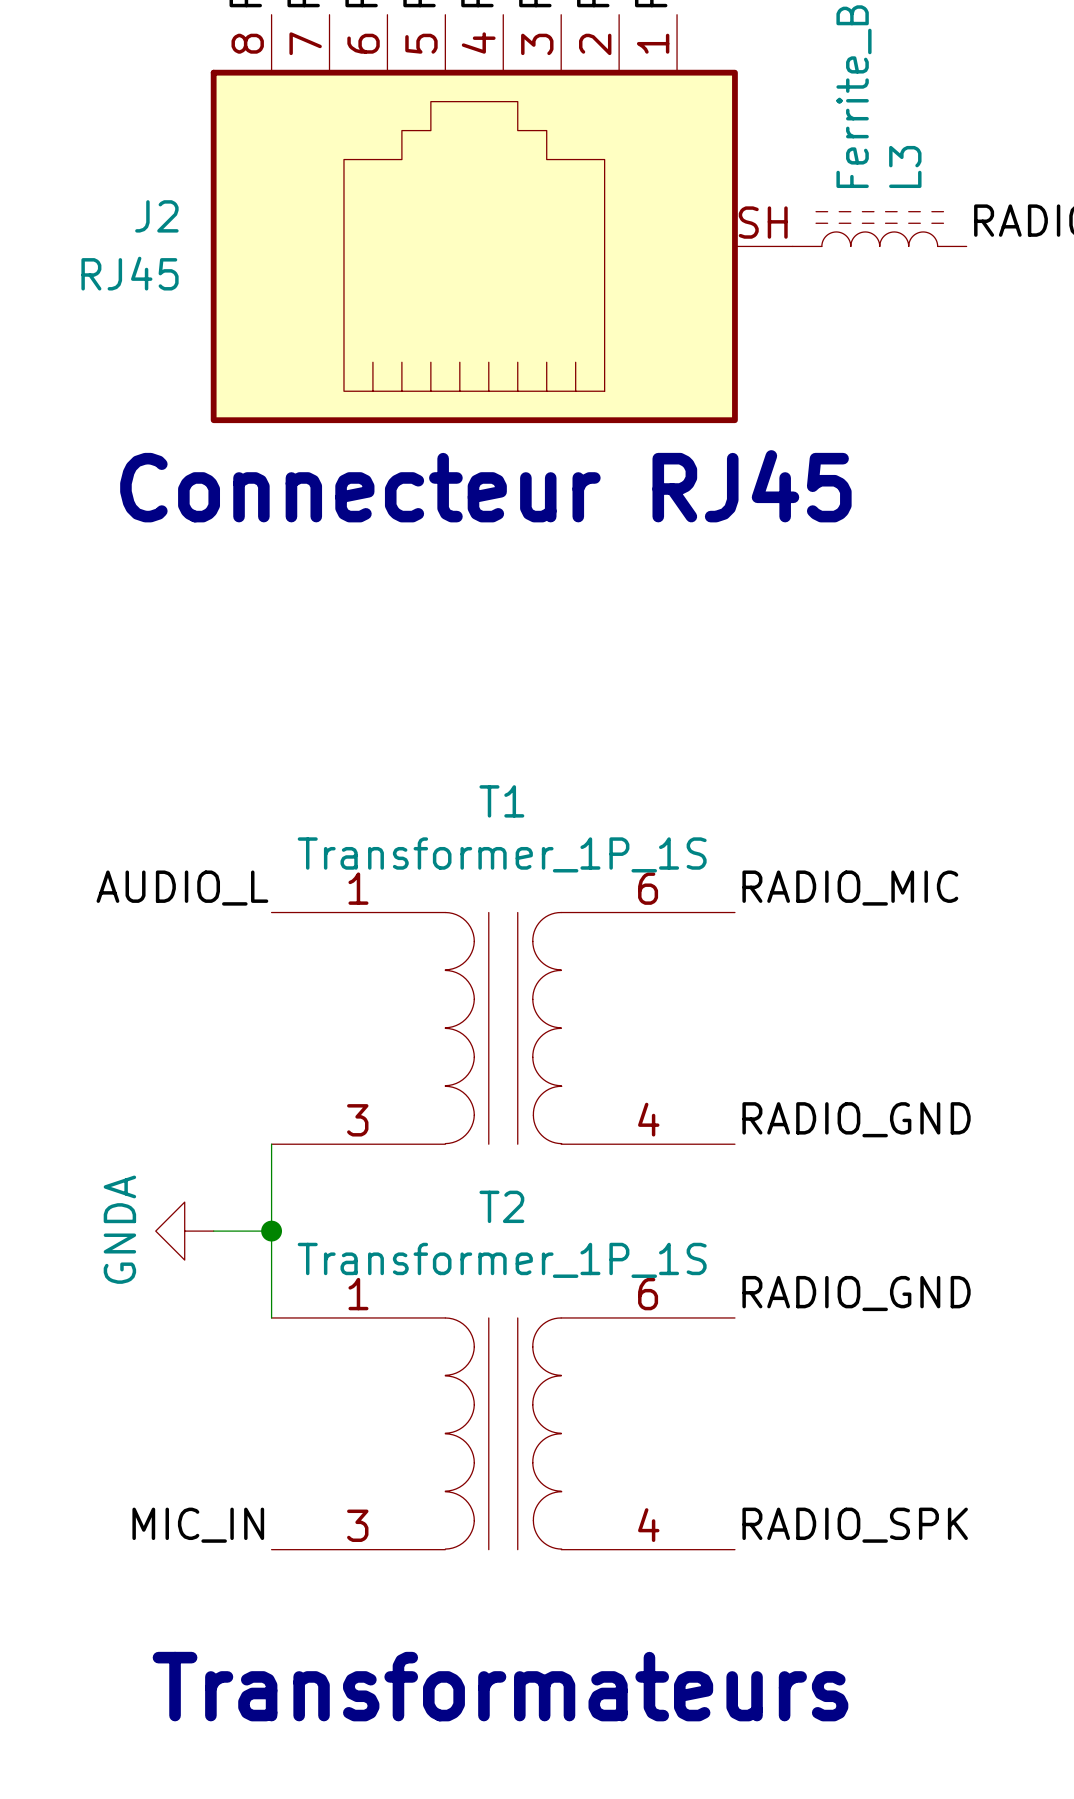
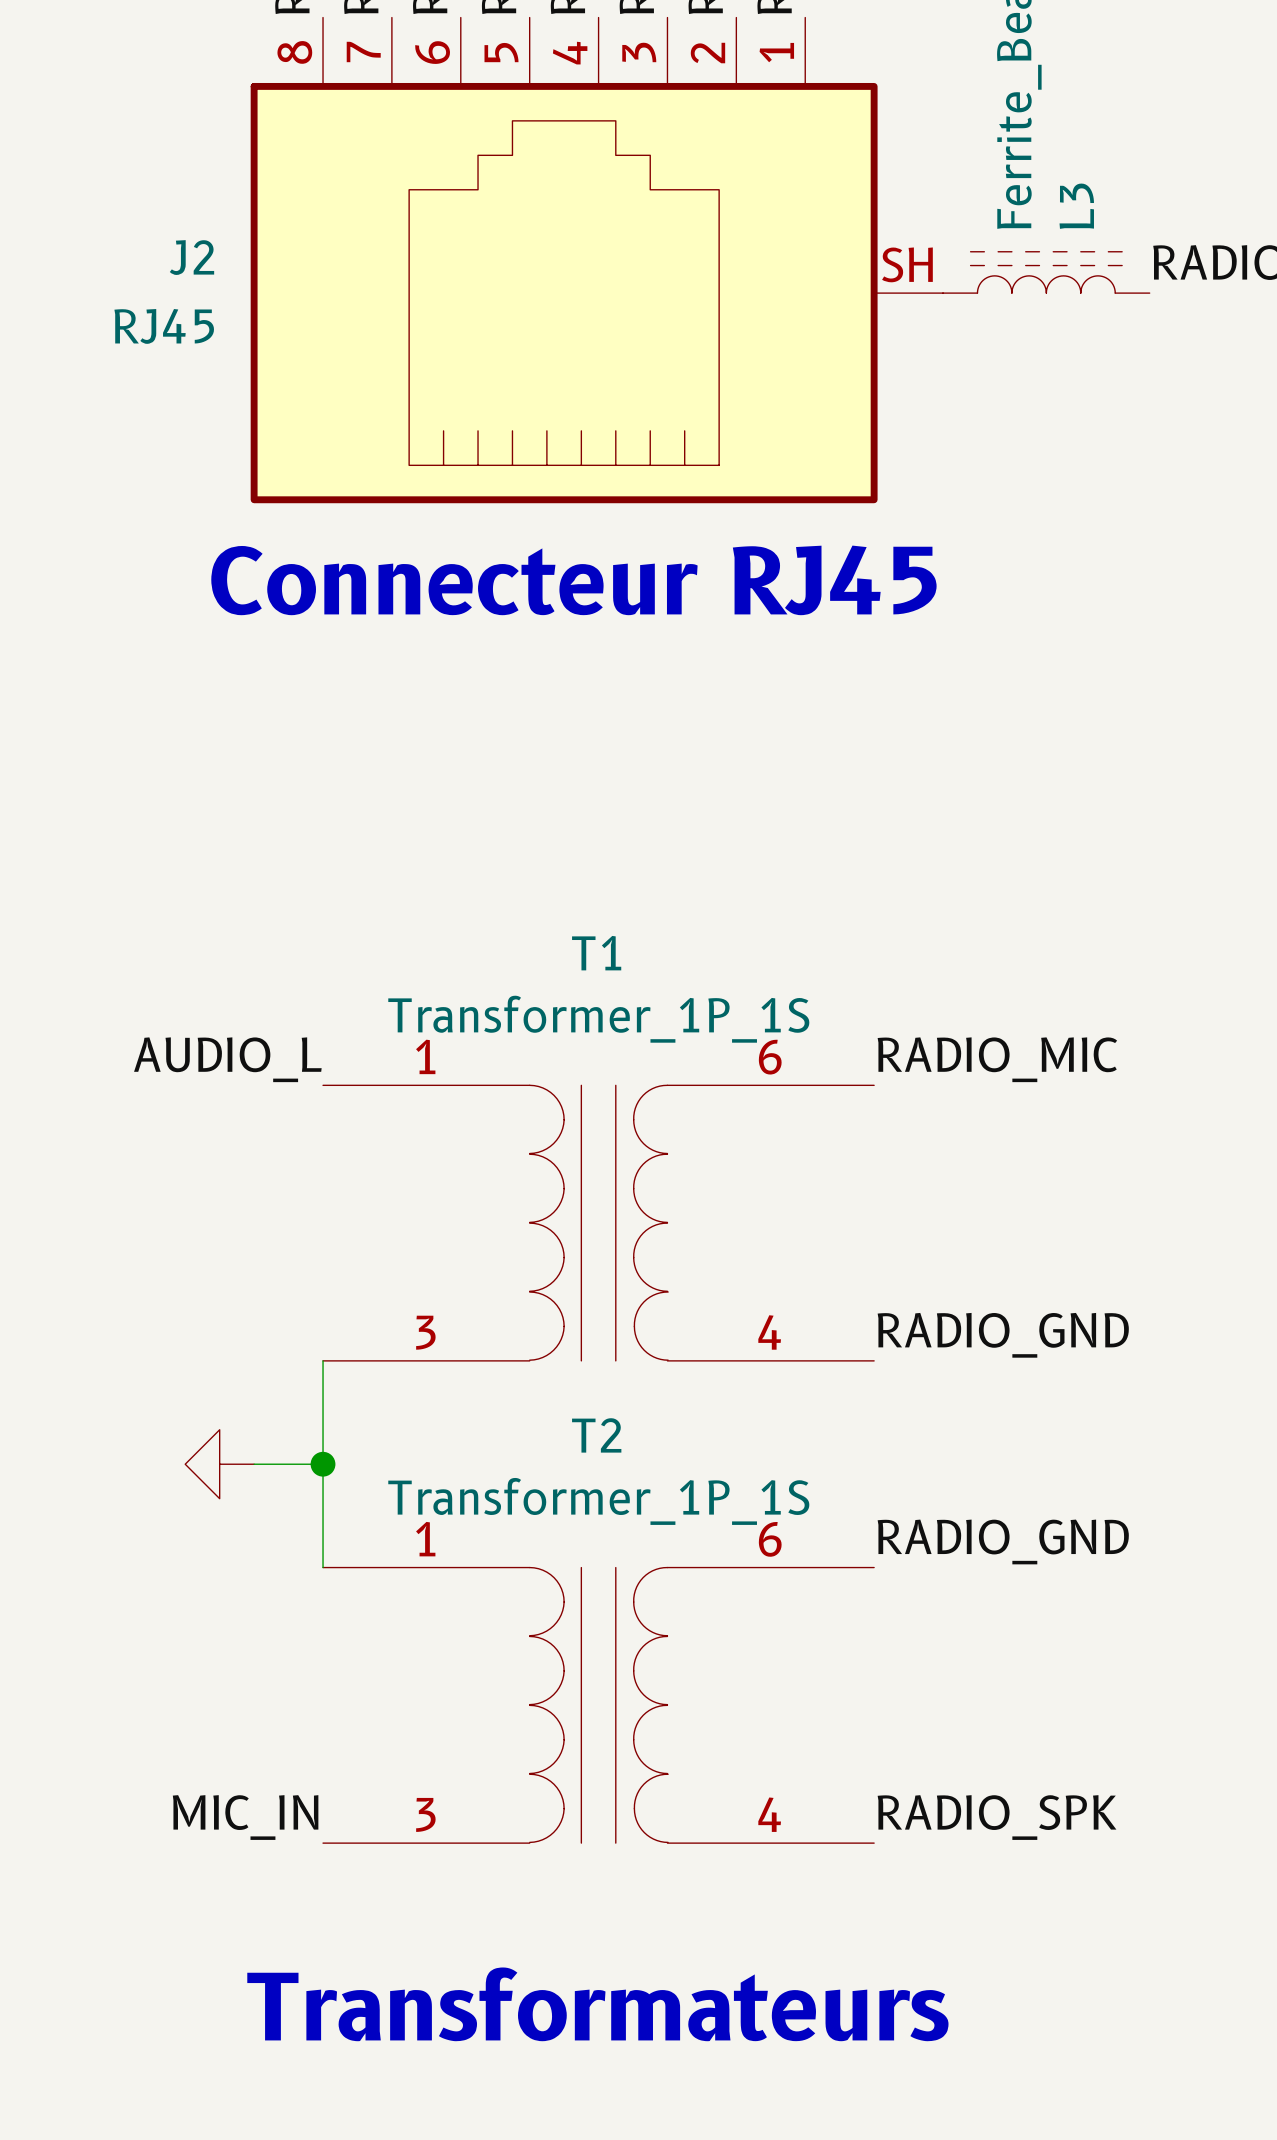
power symbol text: GNDA (119, 1229) -> none

